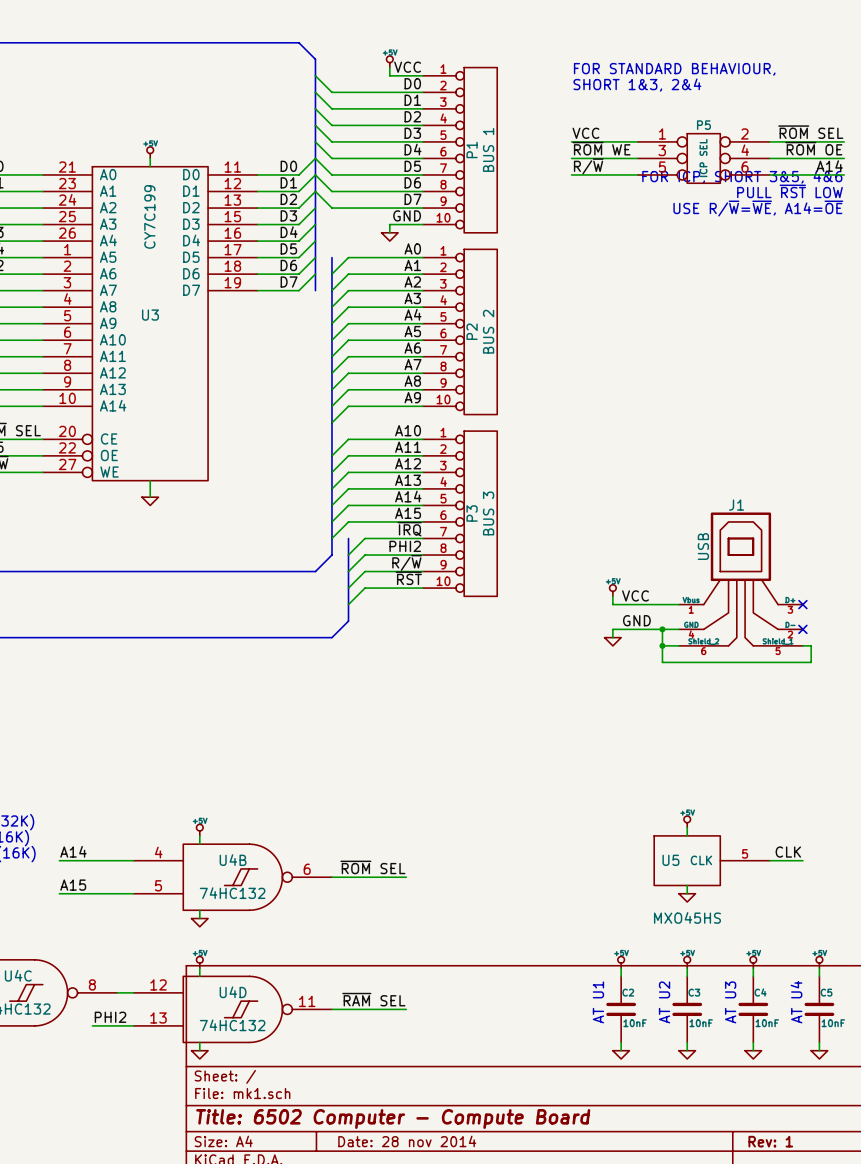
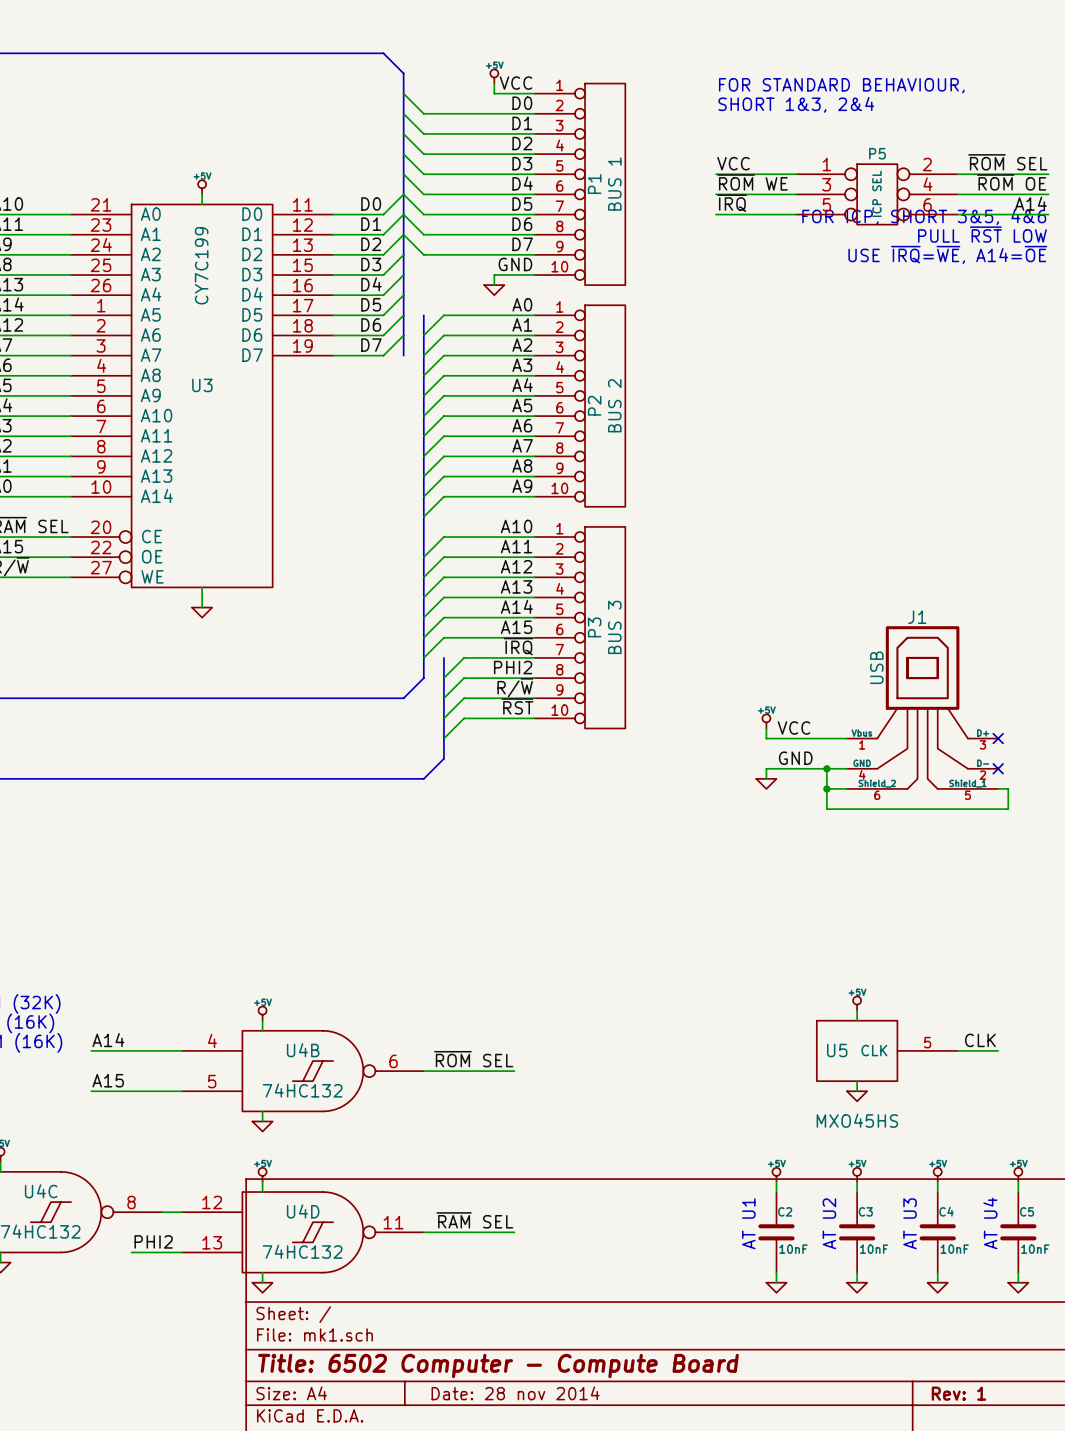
label: R/~{W} (588, 166) -> ~{IRQ} (732, 203)
text: USE R/~{W}=~{WE}, A14=~{OE} (758, 208) -> USE ~{IRQ}=~{WE}, A14=~{OE} (947, 254)

